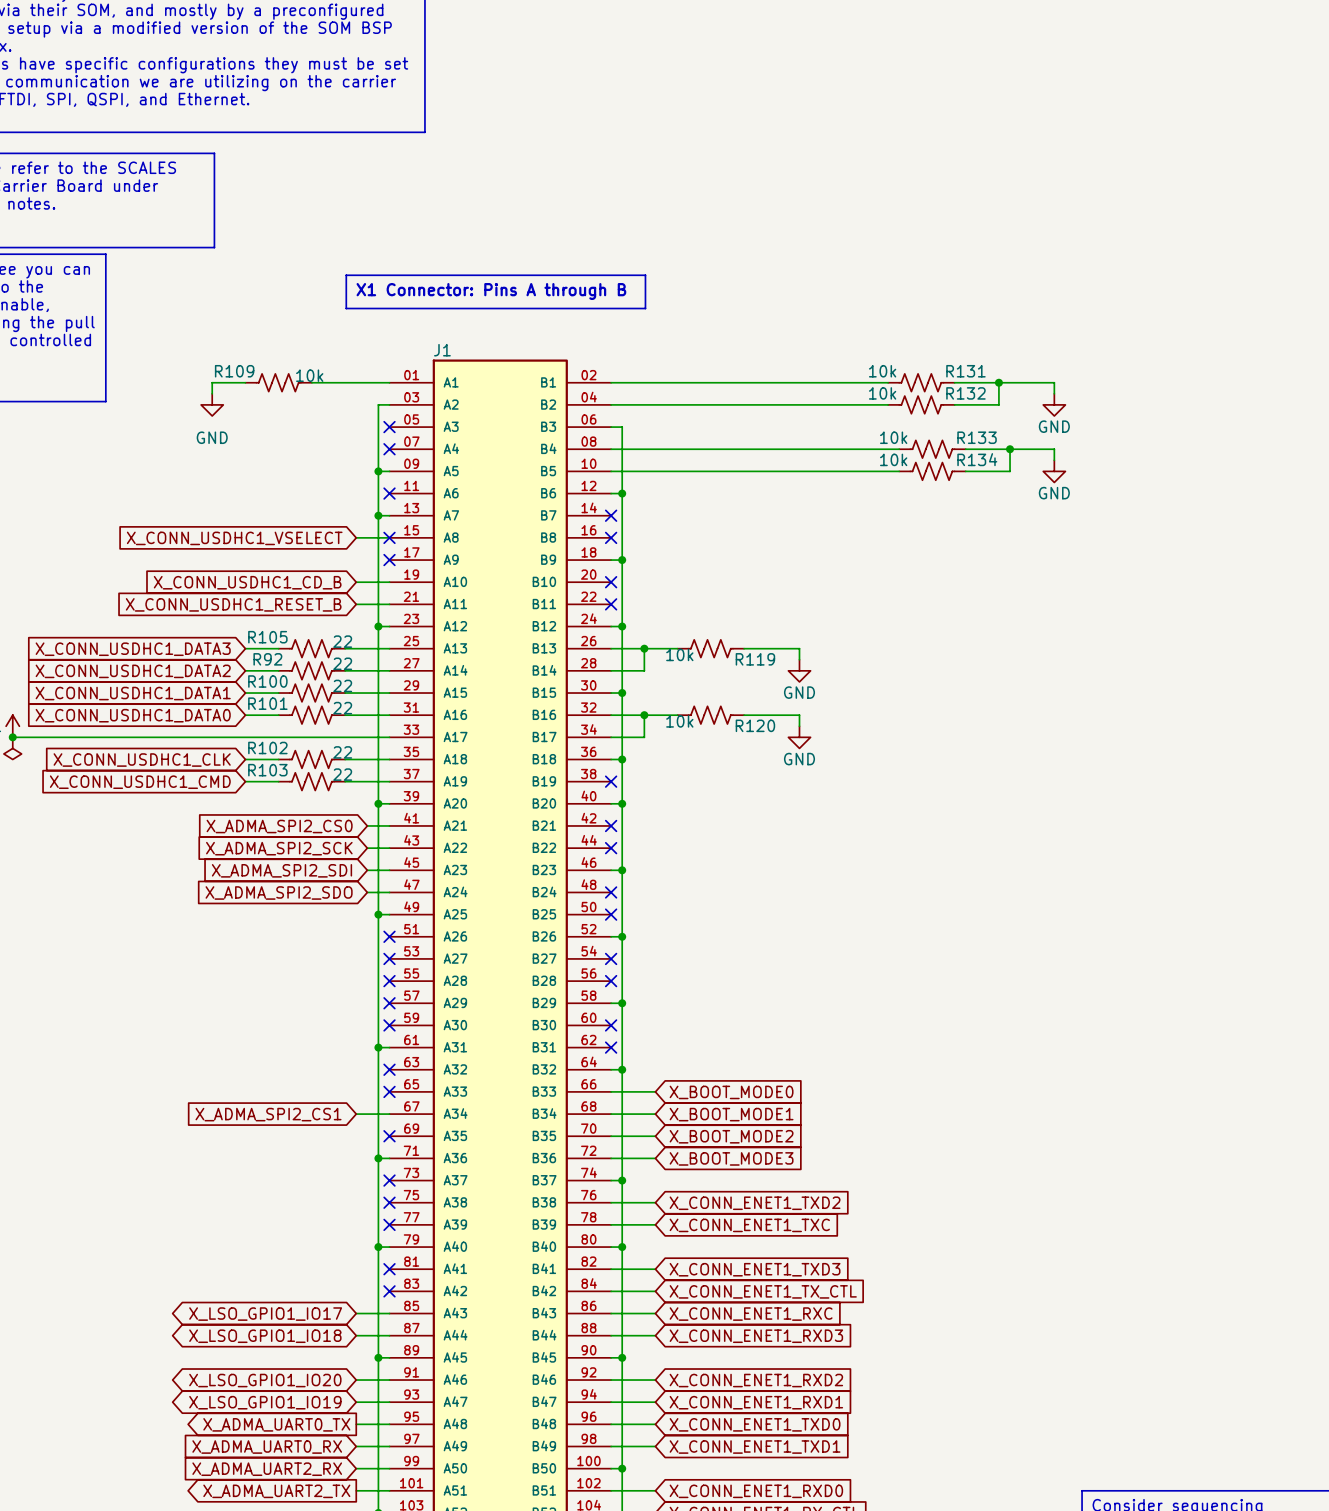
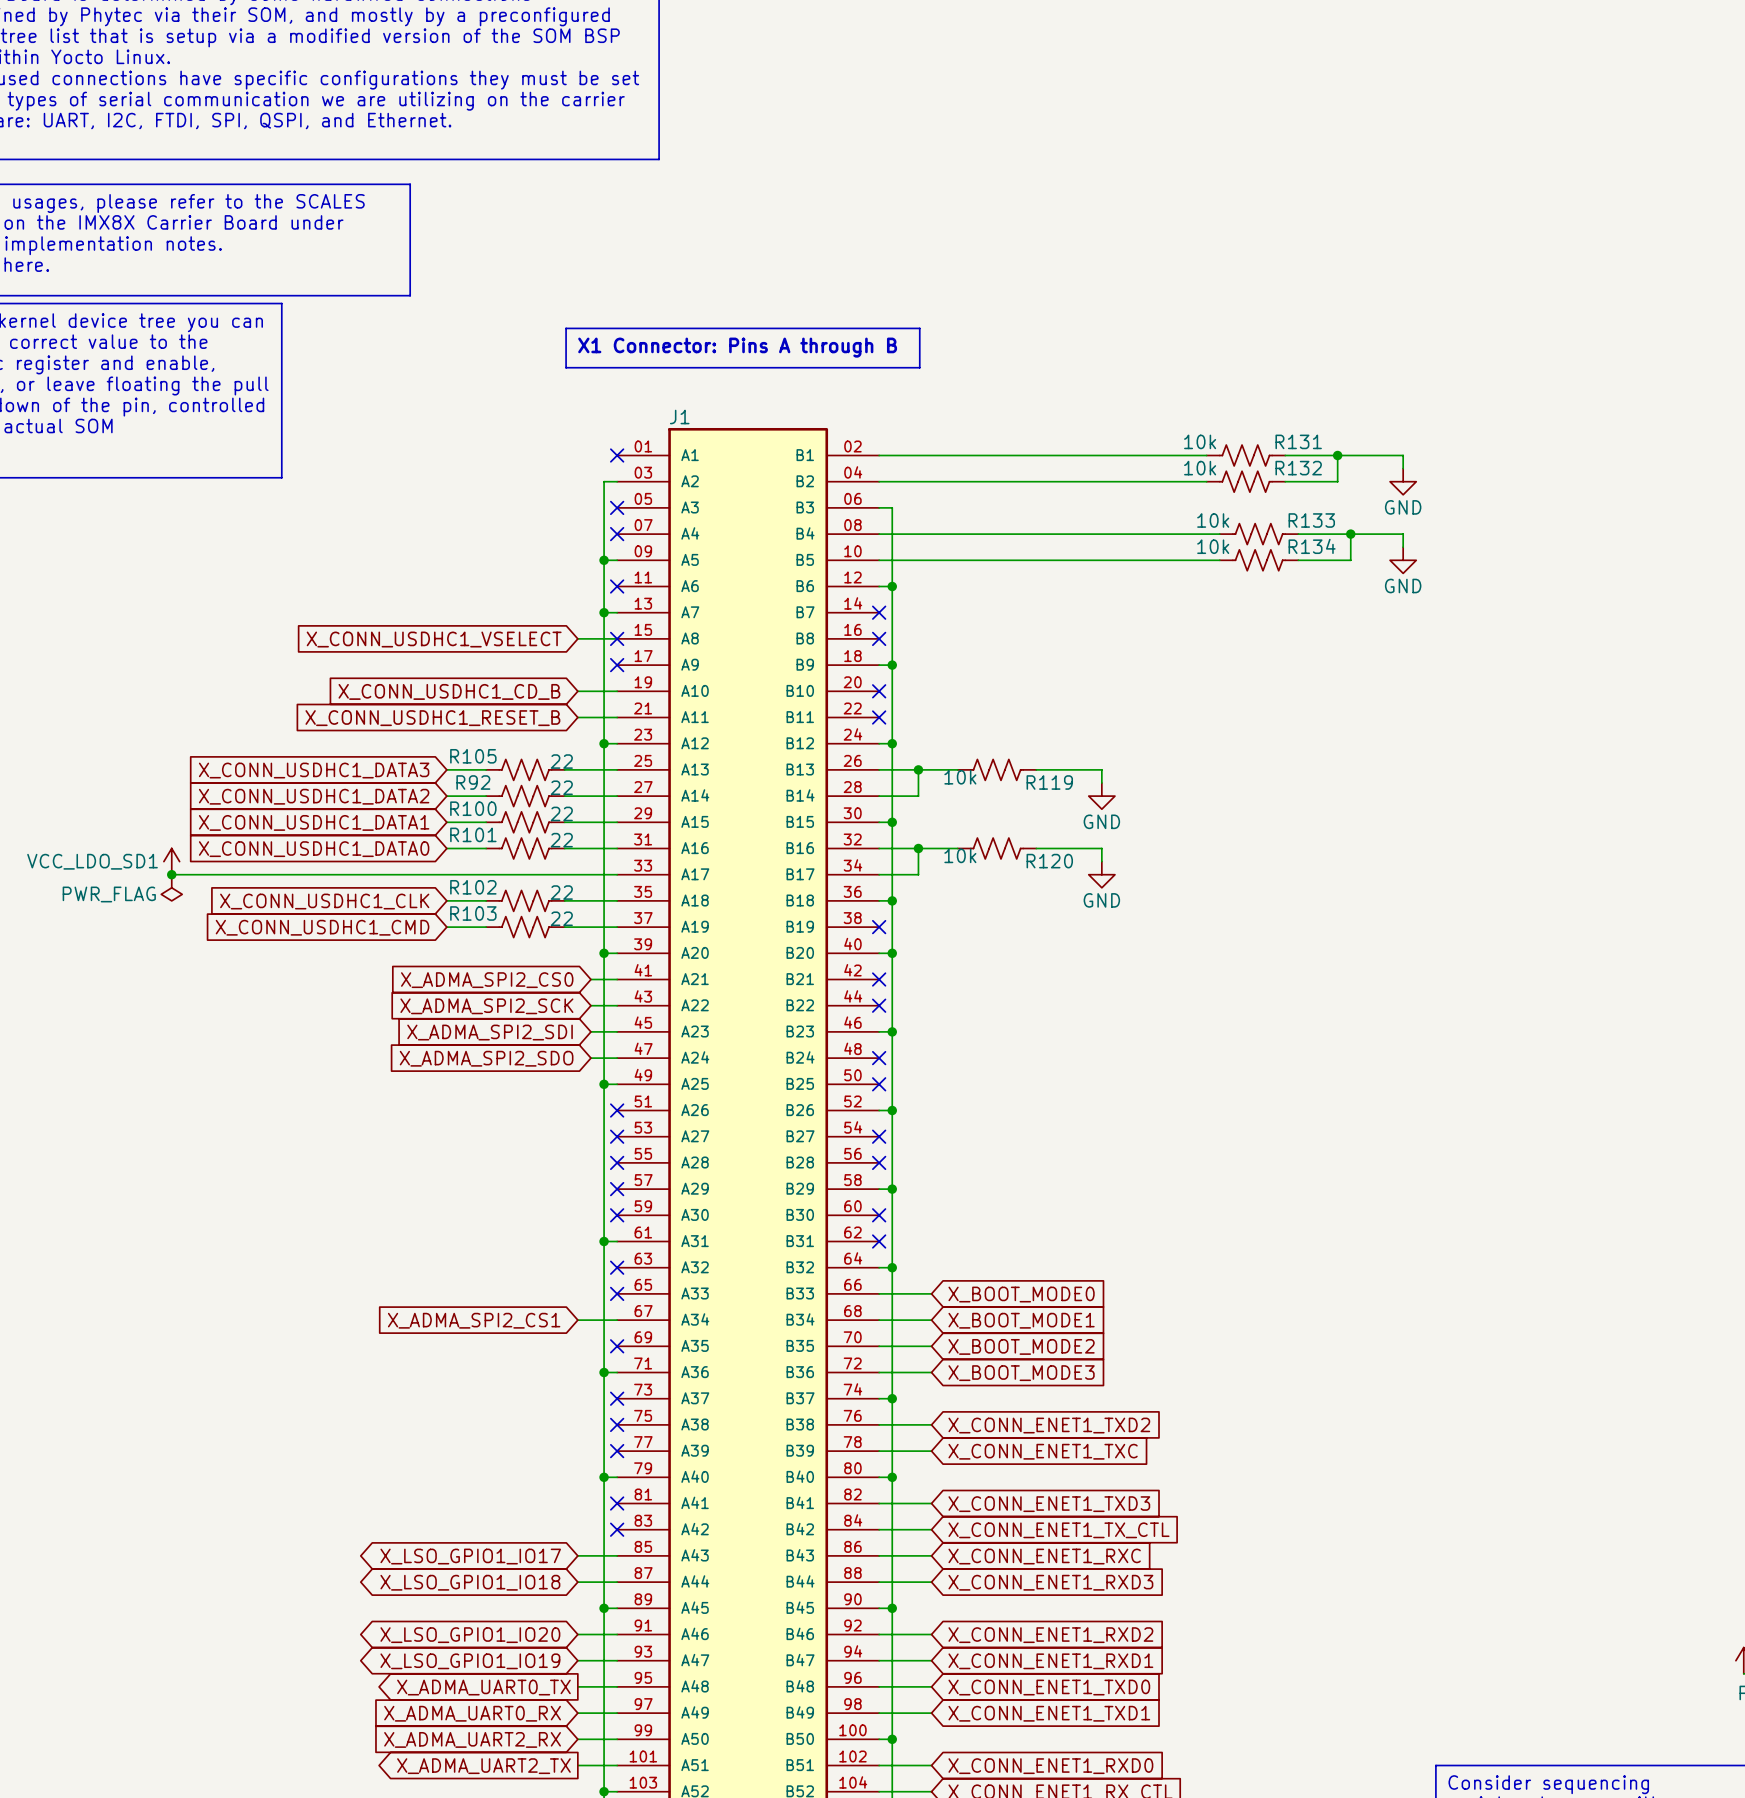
wire: (245, 382) (212, 382) (212, 393) -> none
R109: 10k (278, 382) -> none
wire: (311, 382) (389, 382) -> none
no-connect mark: none -> (617, 455)
power symbol: GND (212, 404) -> none

